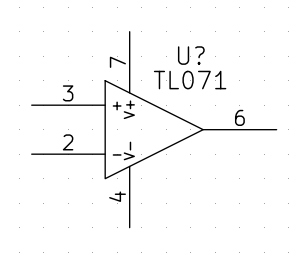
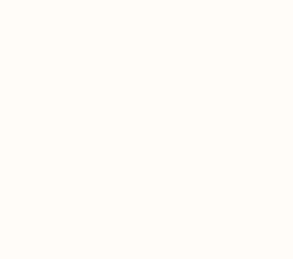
U?: TL071 (154, 129) -> none

